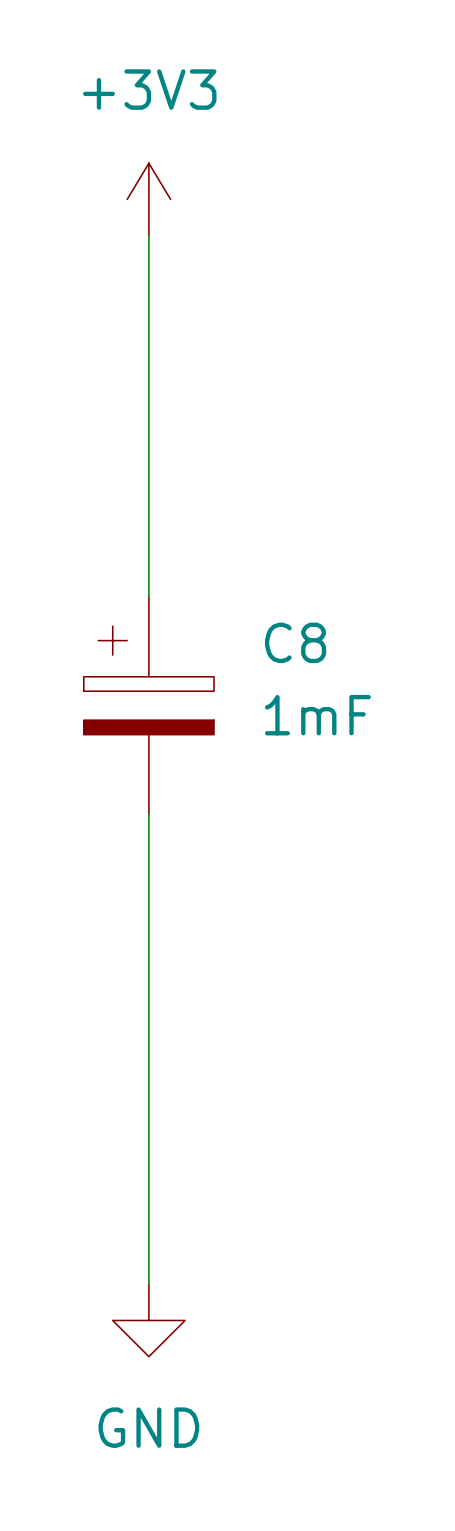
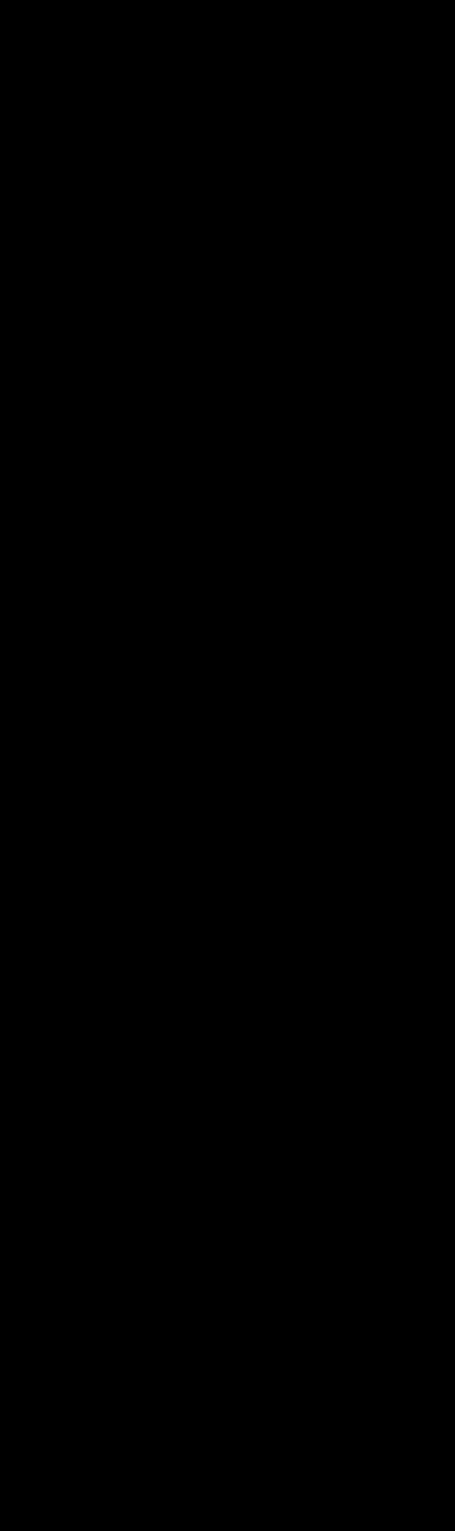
power symbol: +3V3 (148, 199) -> none
wire: (148, 235) (148, 597) -> none
C8: 1mF (148, 705) -> none
wire: (148, 814) (148, 1284) -> none
power symbol: GND (148, 1320) -> none

